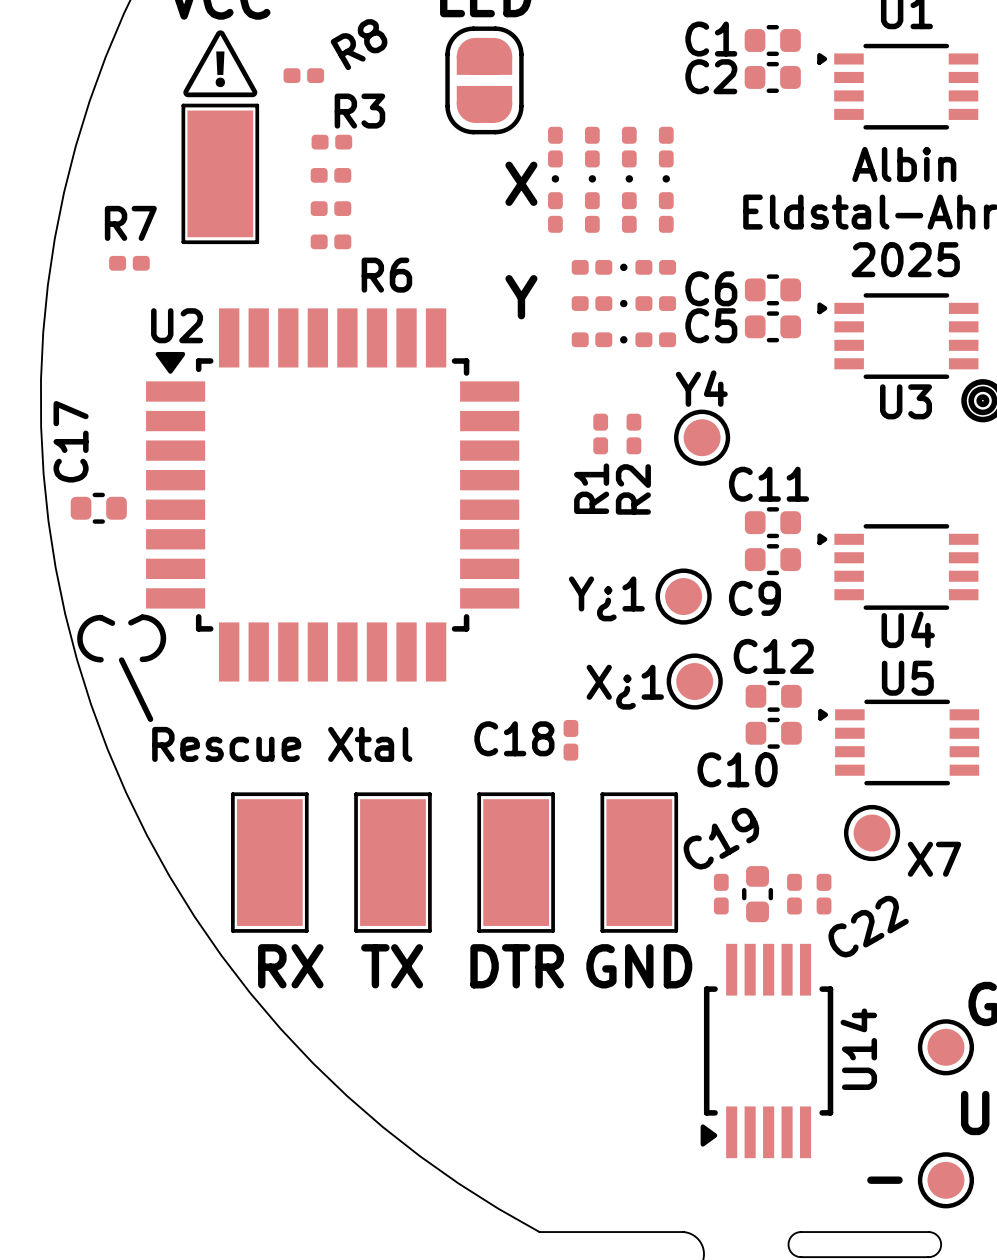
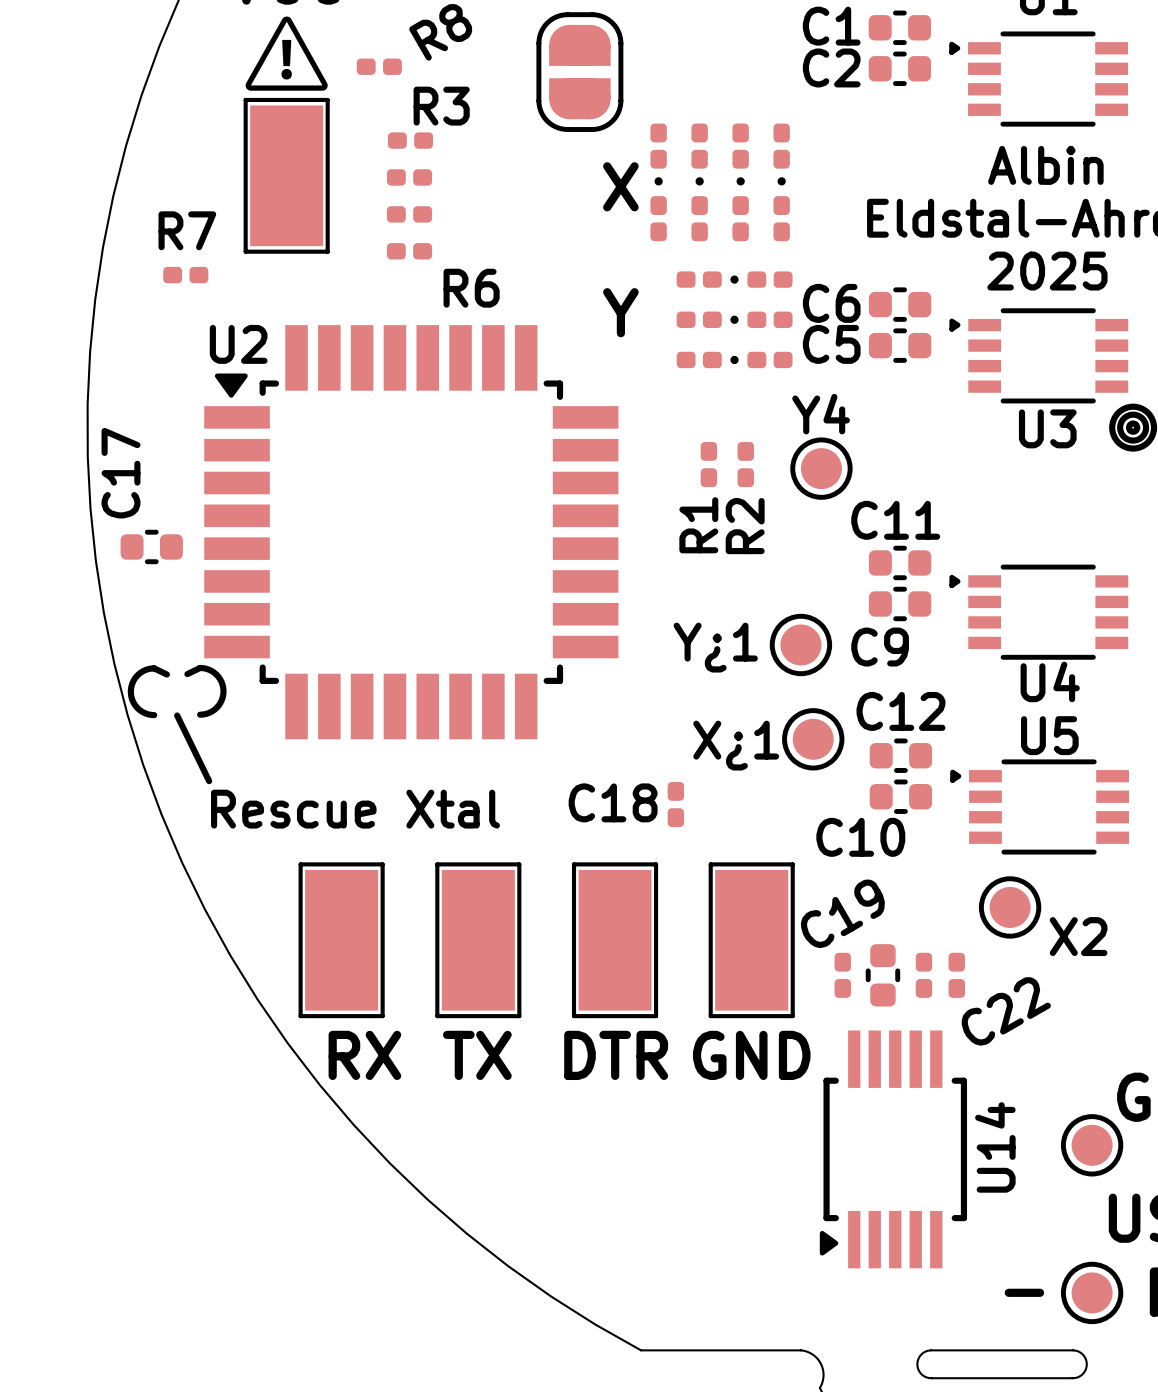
X7 name: X7 (934, 859) -> X2 (1078, 936)

